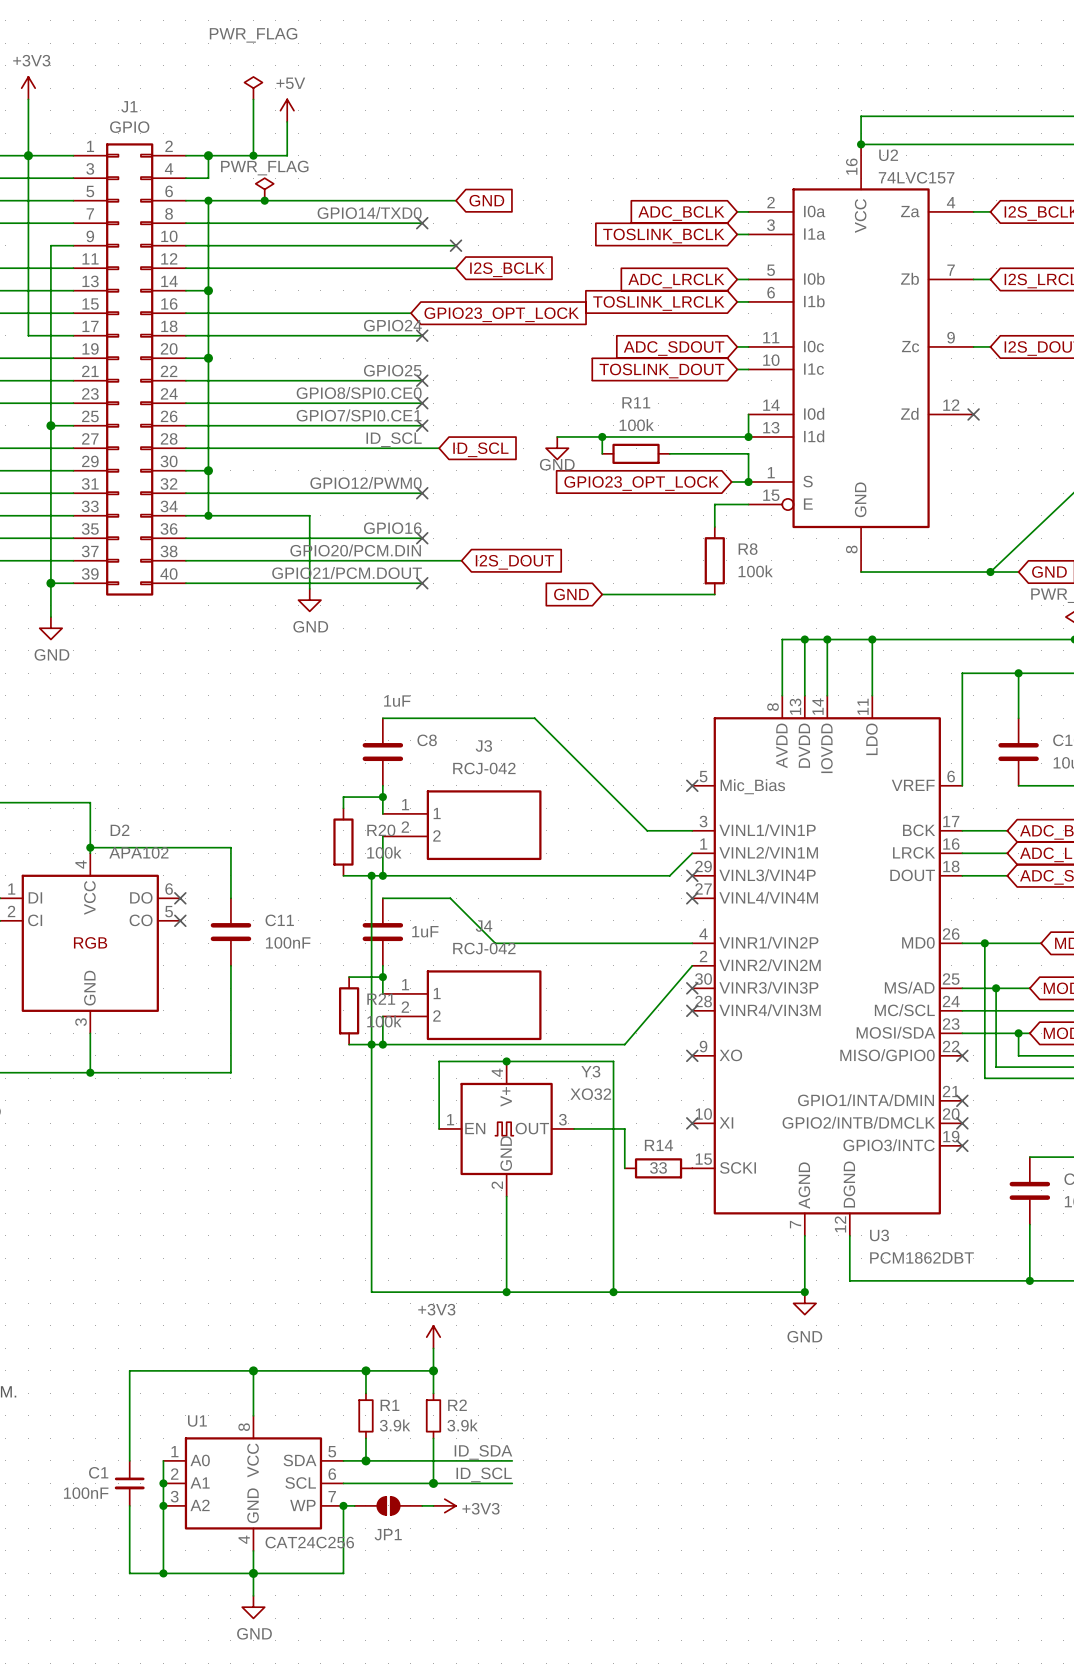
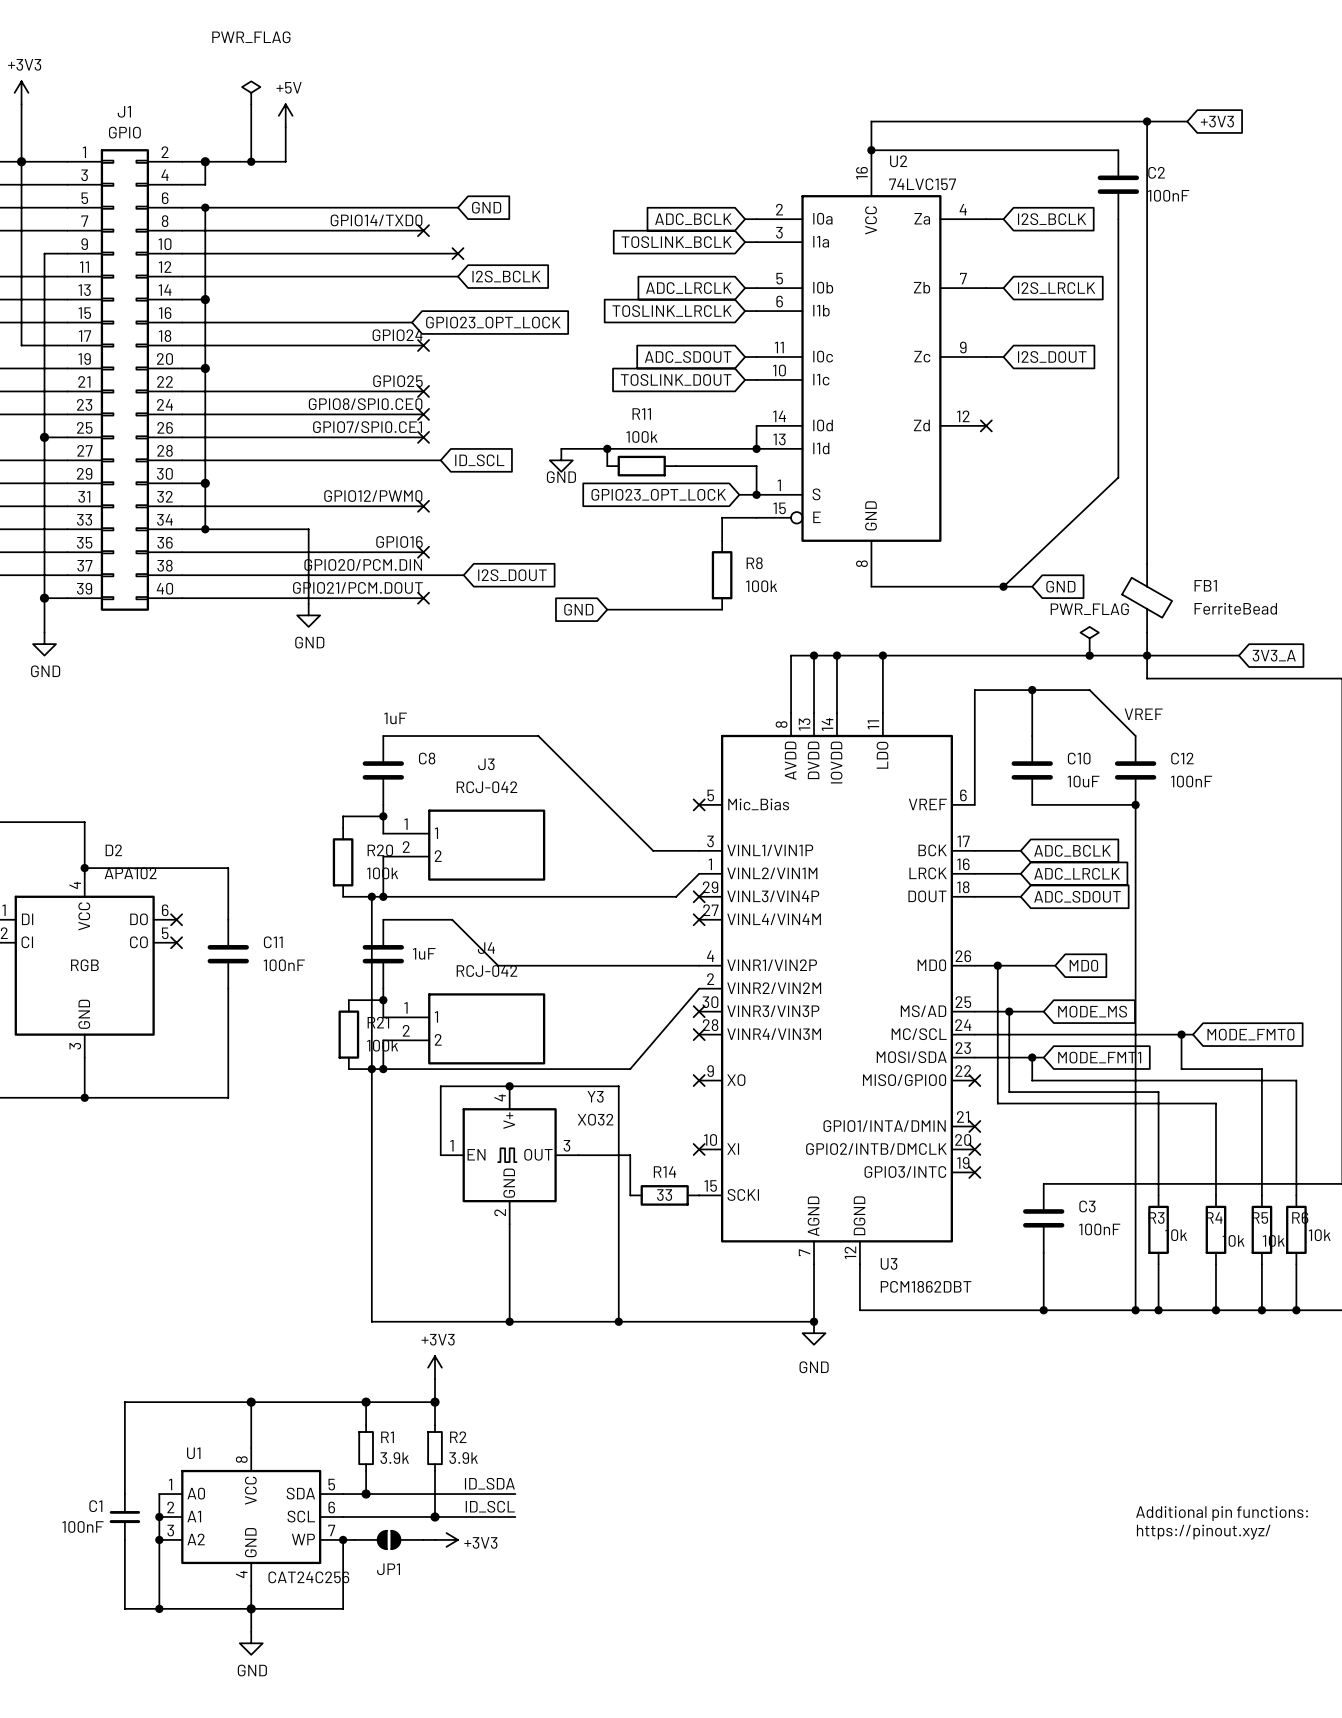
power symbol: PWR_FLAG (264, 189) -> none
junction: (264, 200) -> none
label: ID_SCL (394, 439) -> none

